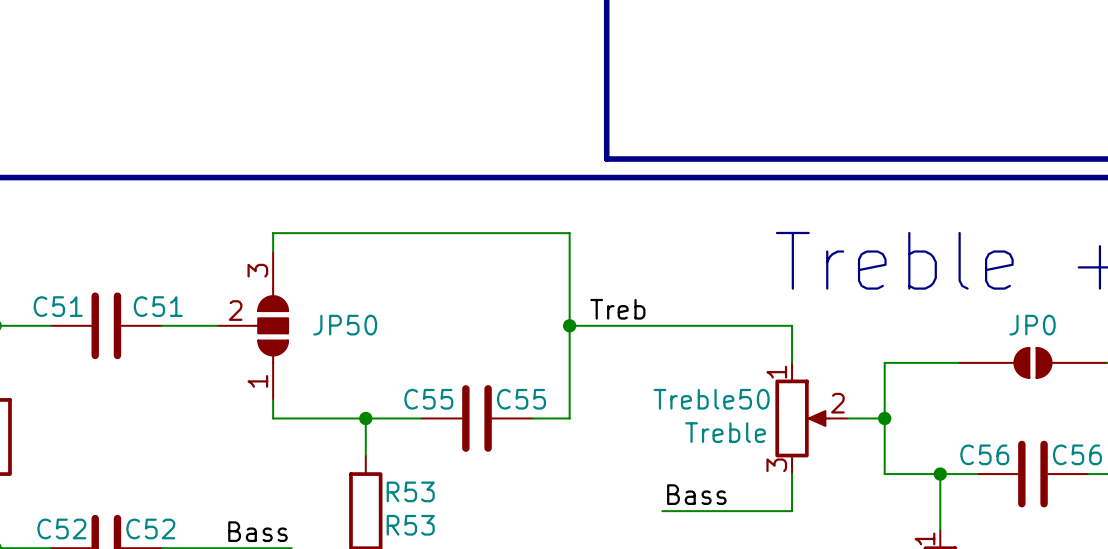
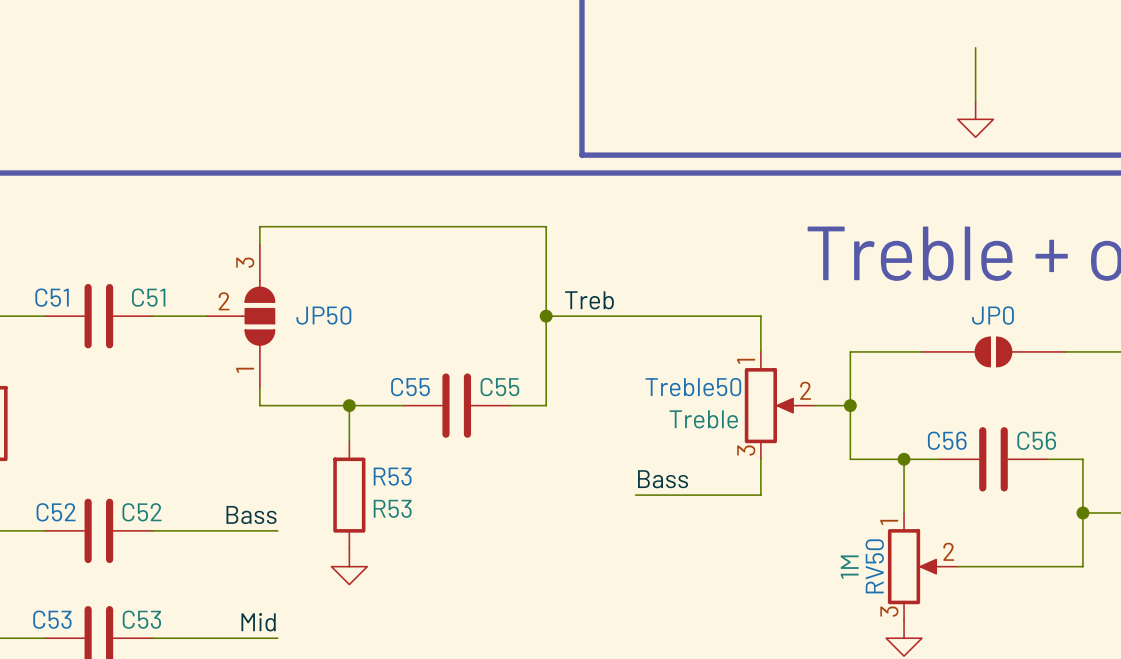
wire: none -> (975, 47) (975, 101)
power symbol: none -> (975, 119)

